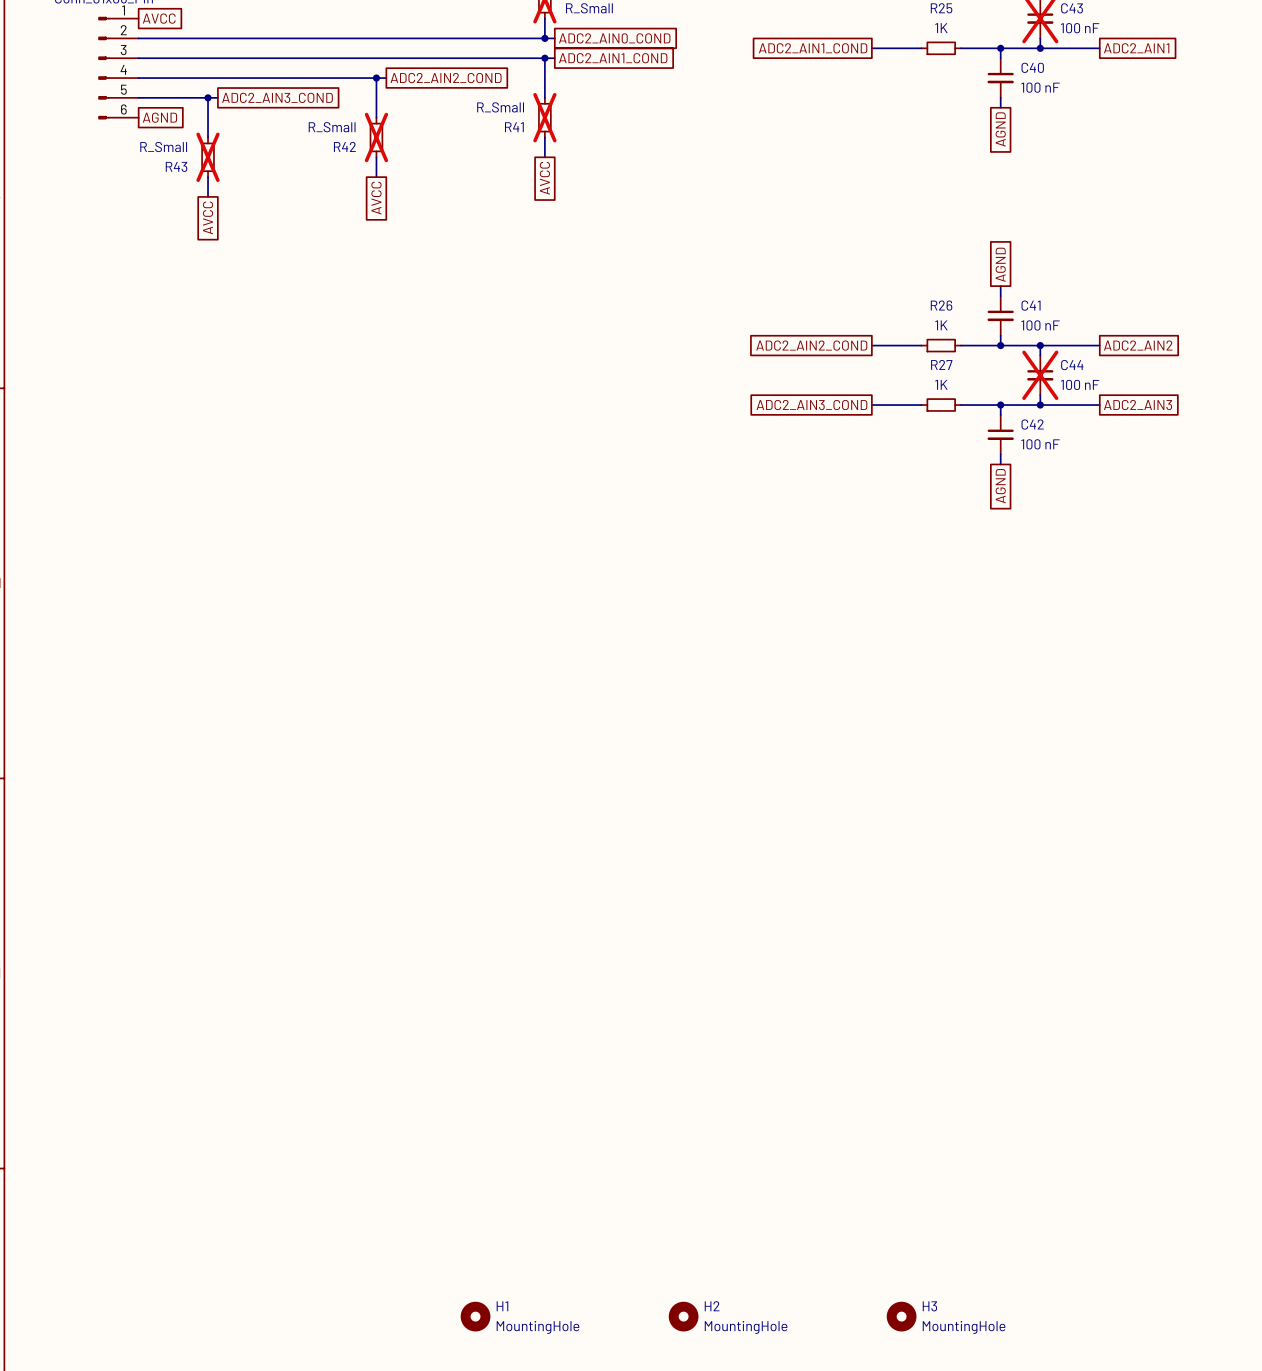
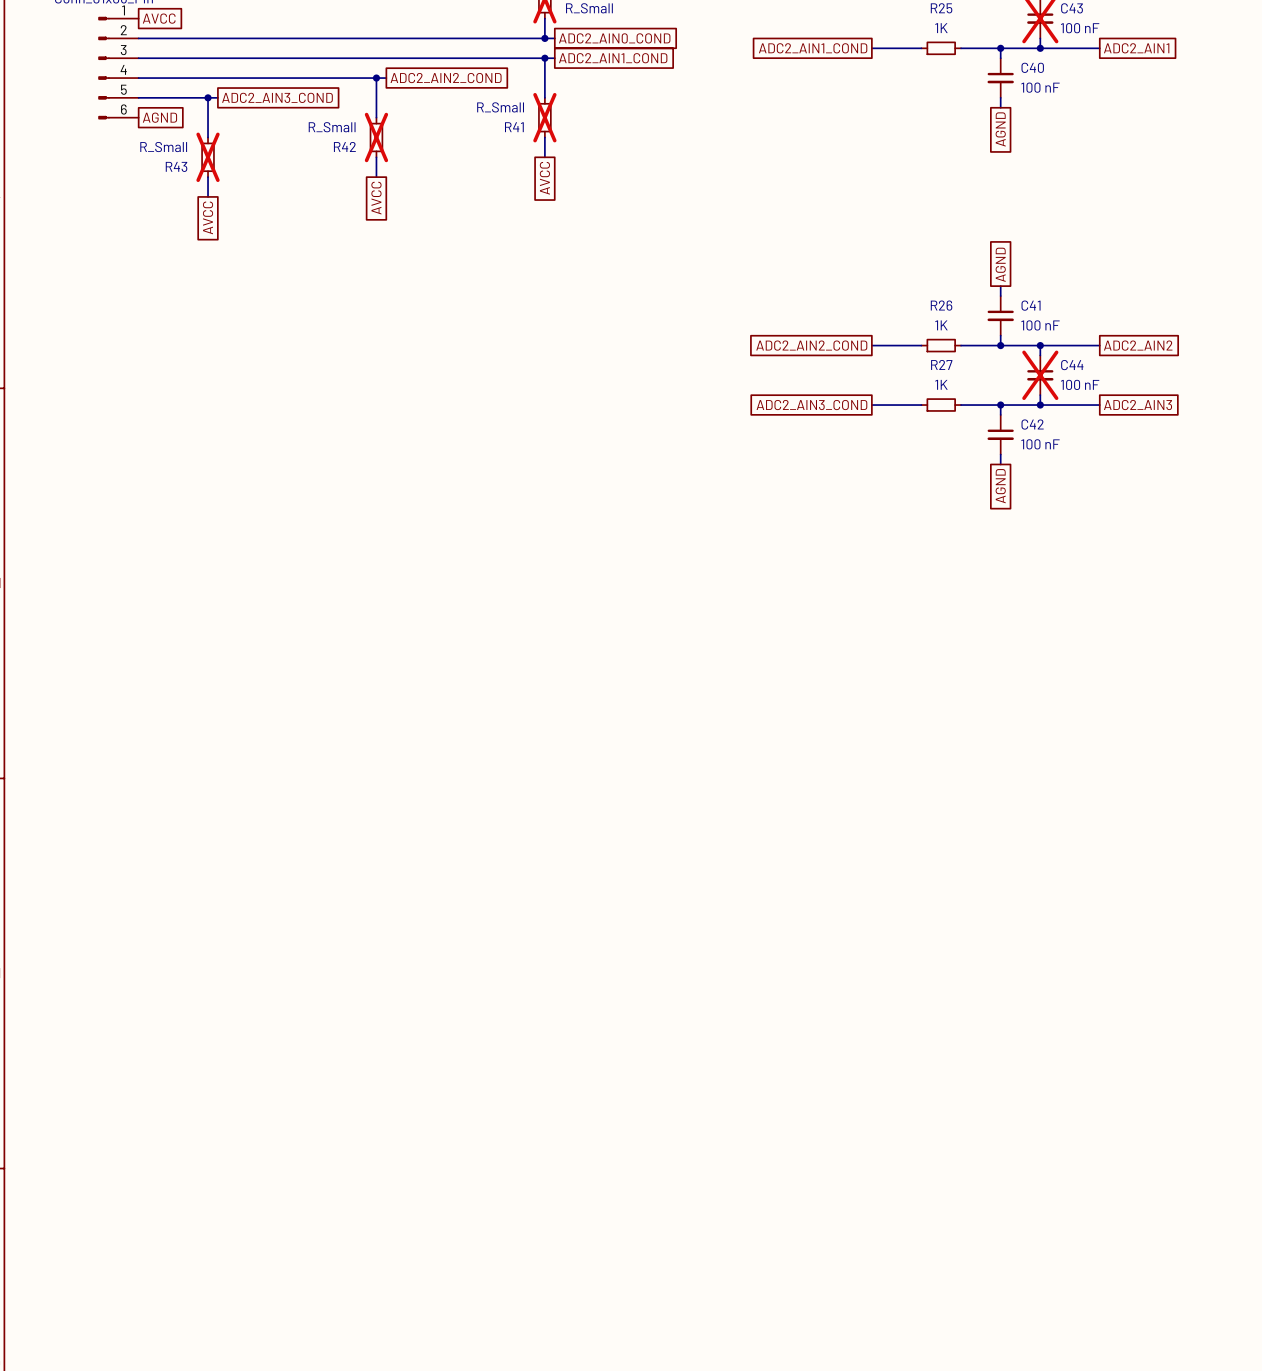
H1: MountingHole (475, 1316) -> none
H2: MountingHole (683, 1316) -> none
H3: MountingHole (901, 1316) -> none

